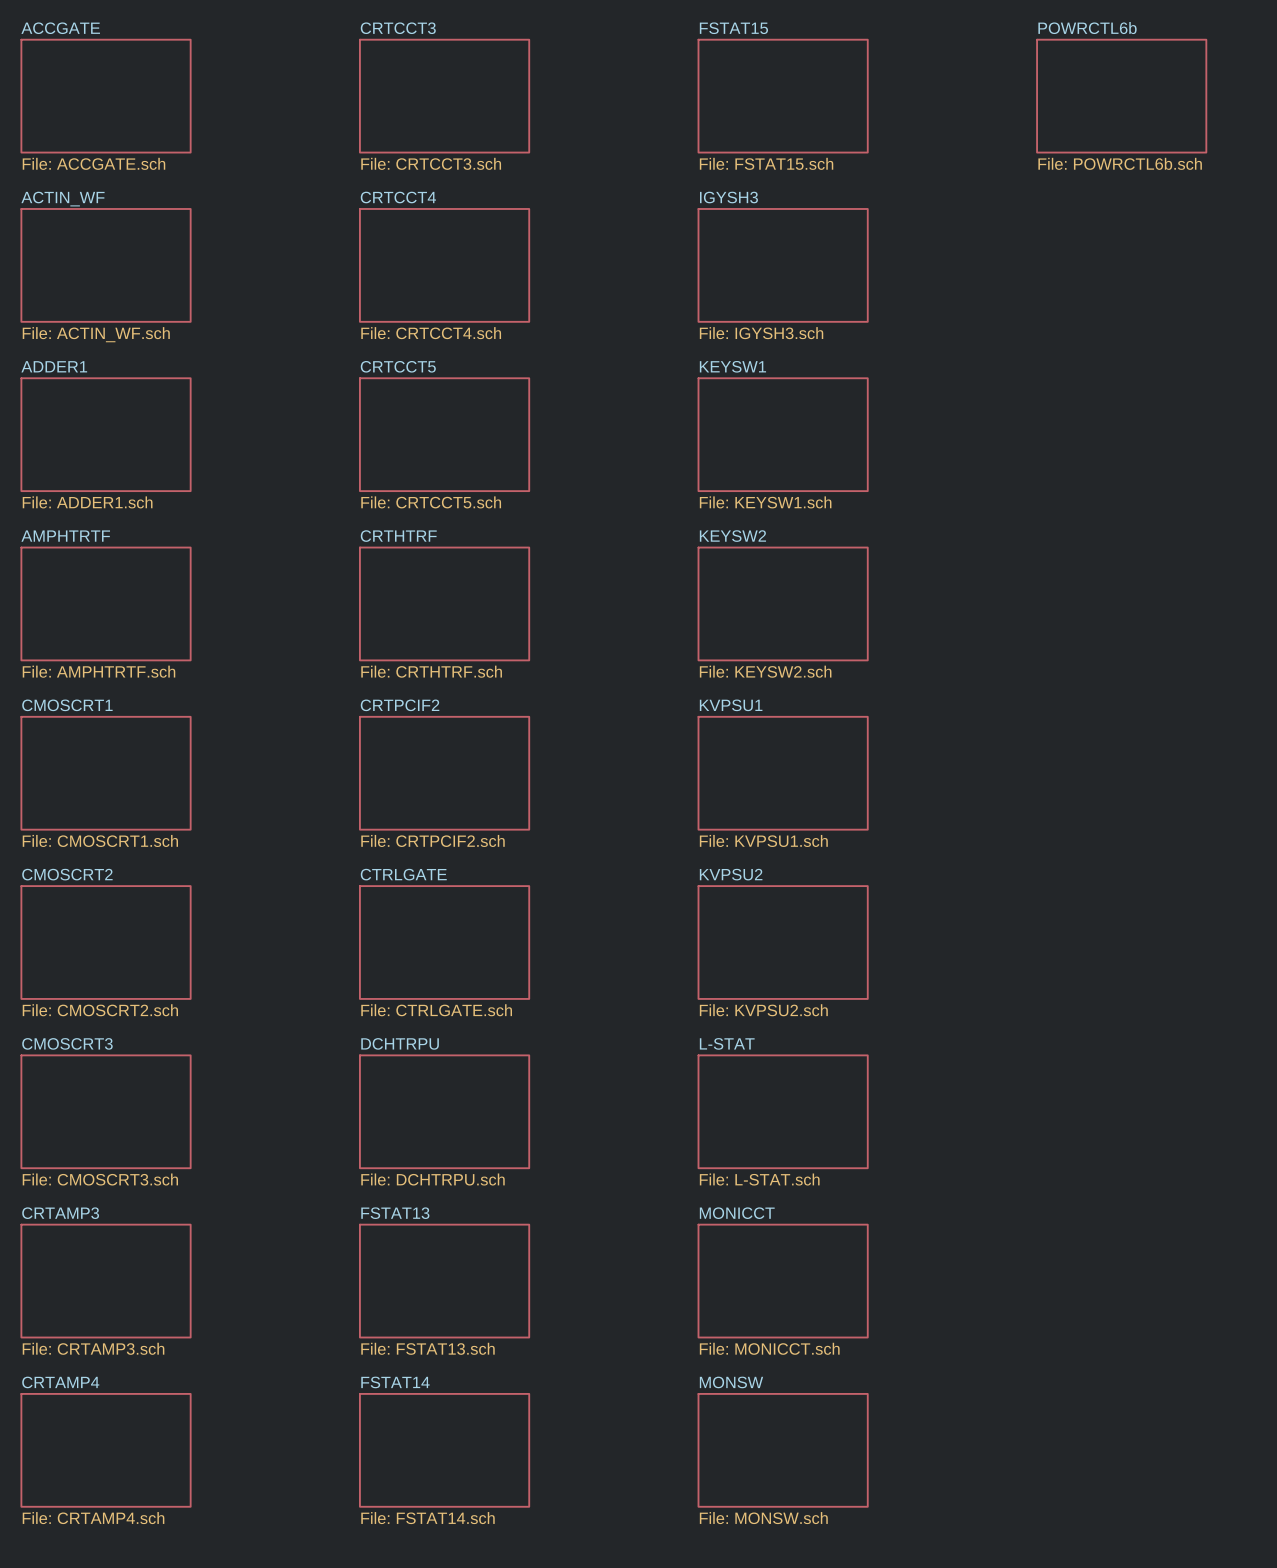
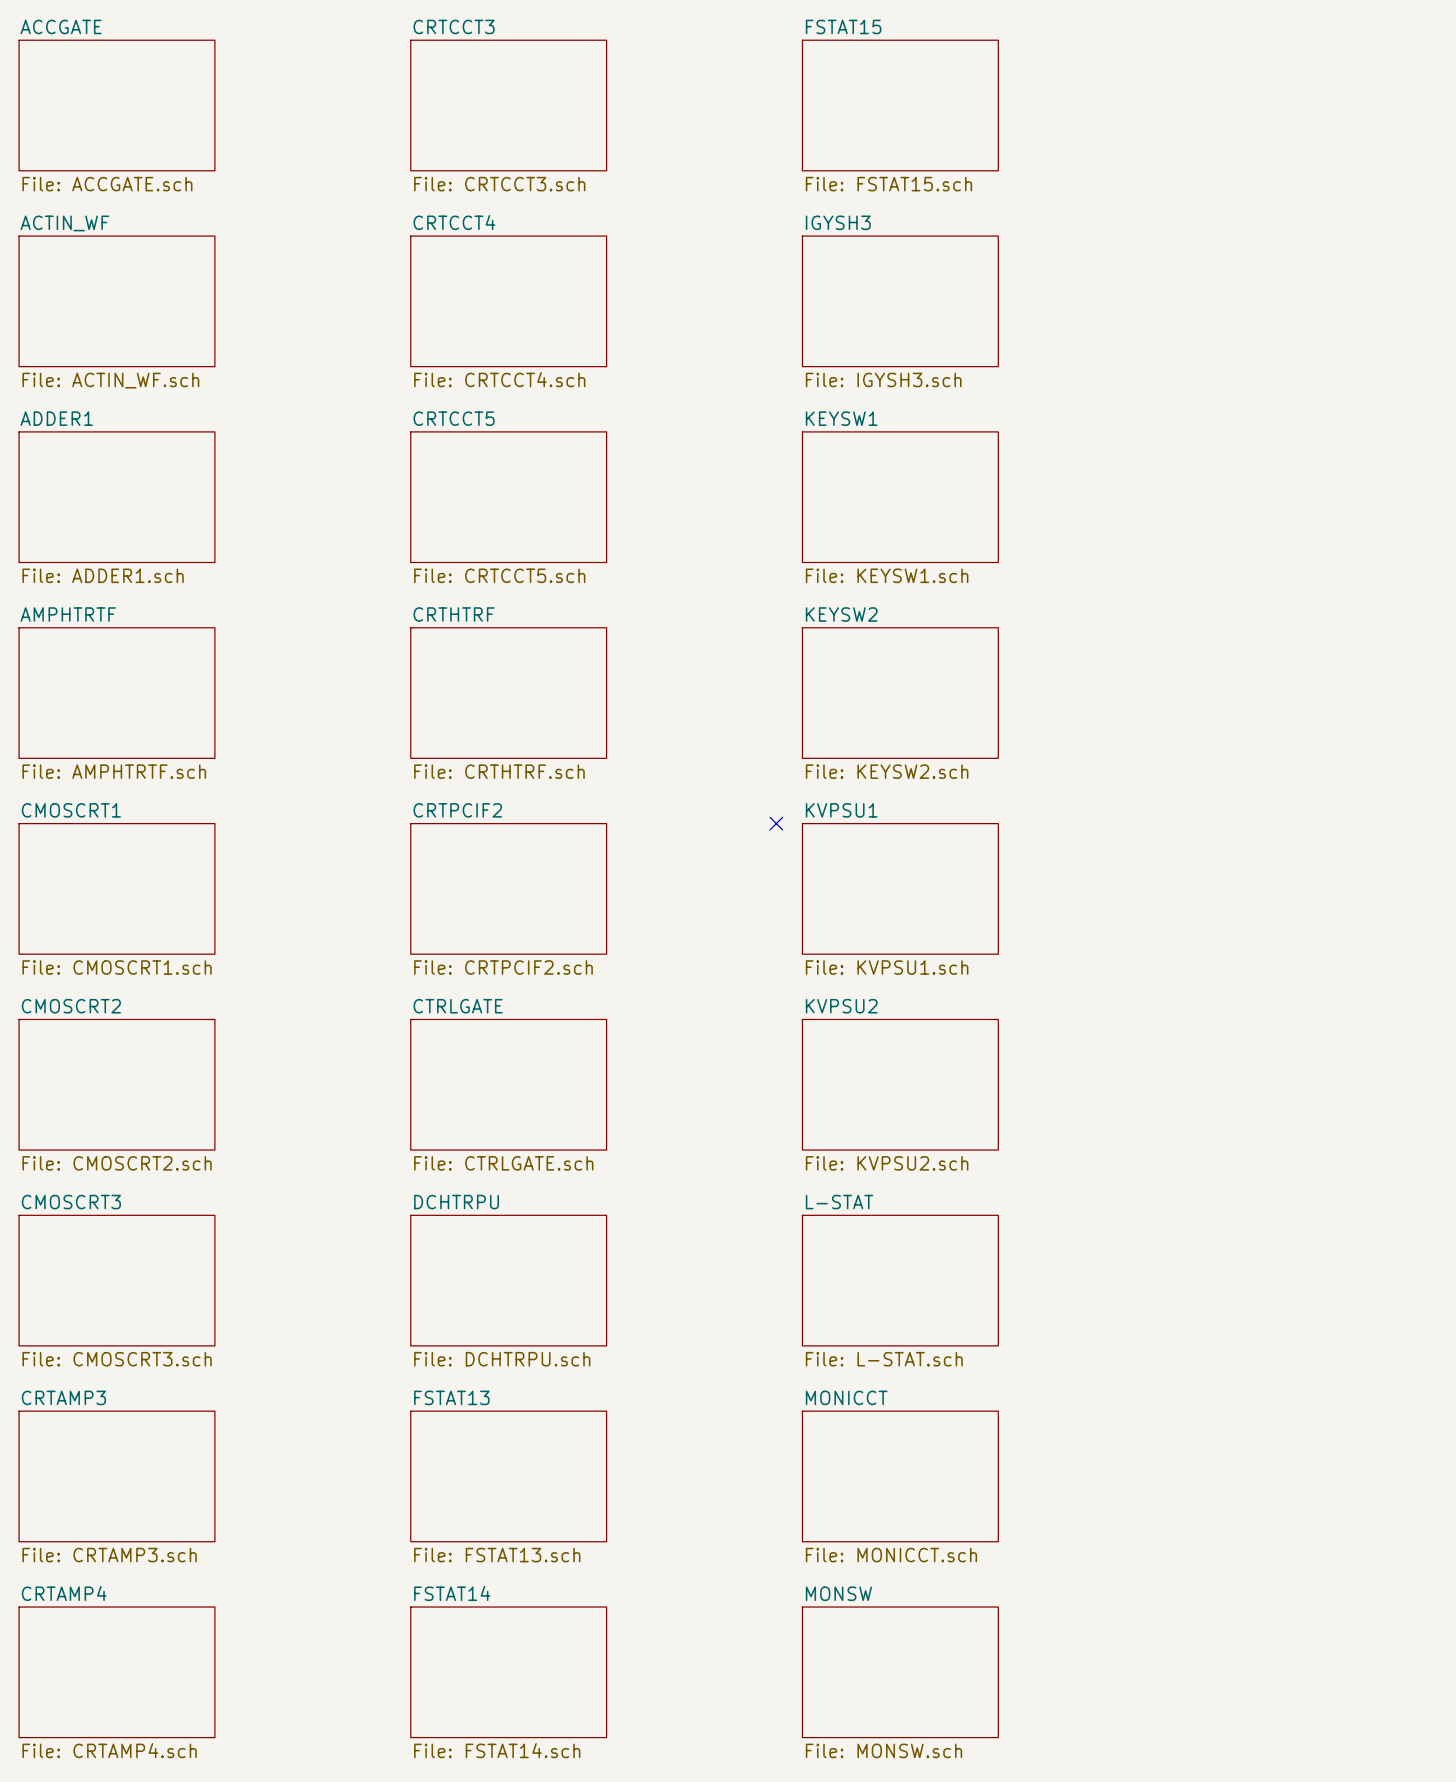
sheet POWRCTL6b: File: POWRCTL6b.sch (1121, 96) -> none
no-connect mark: none -> (776, 823)

